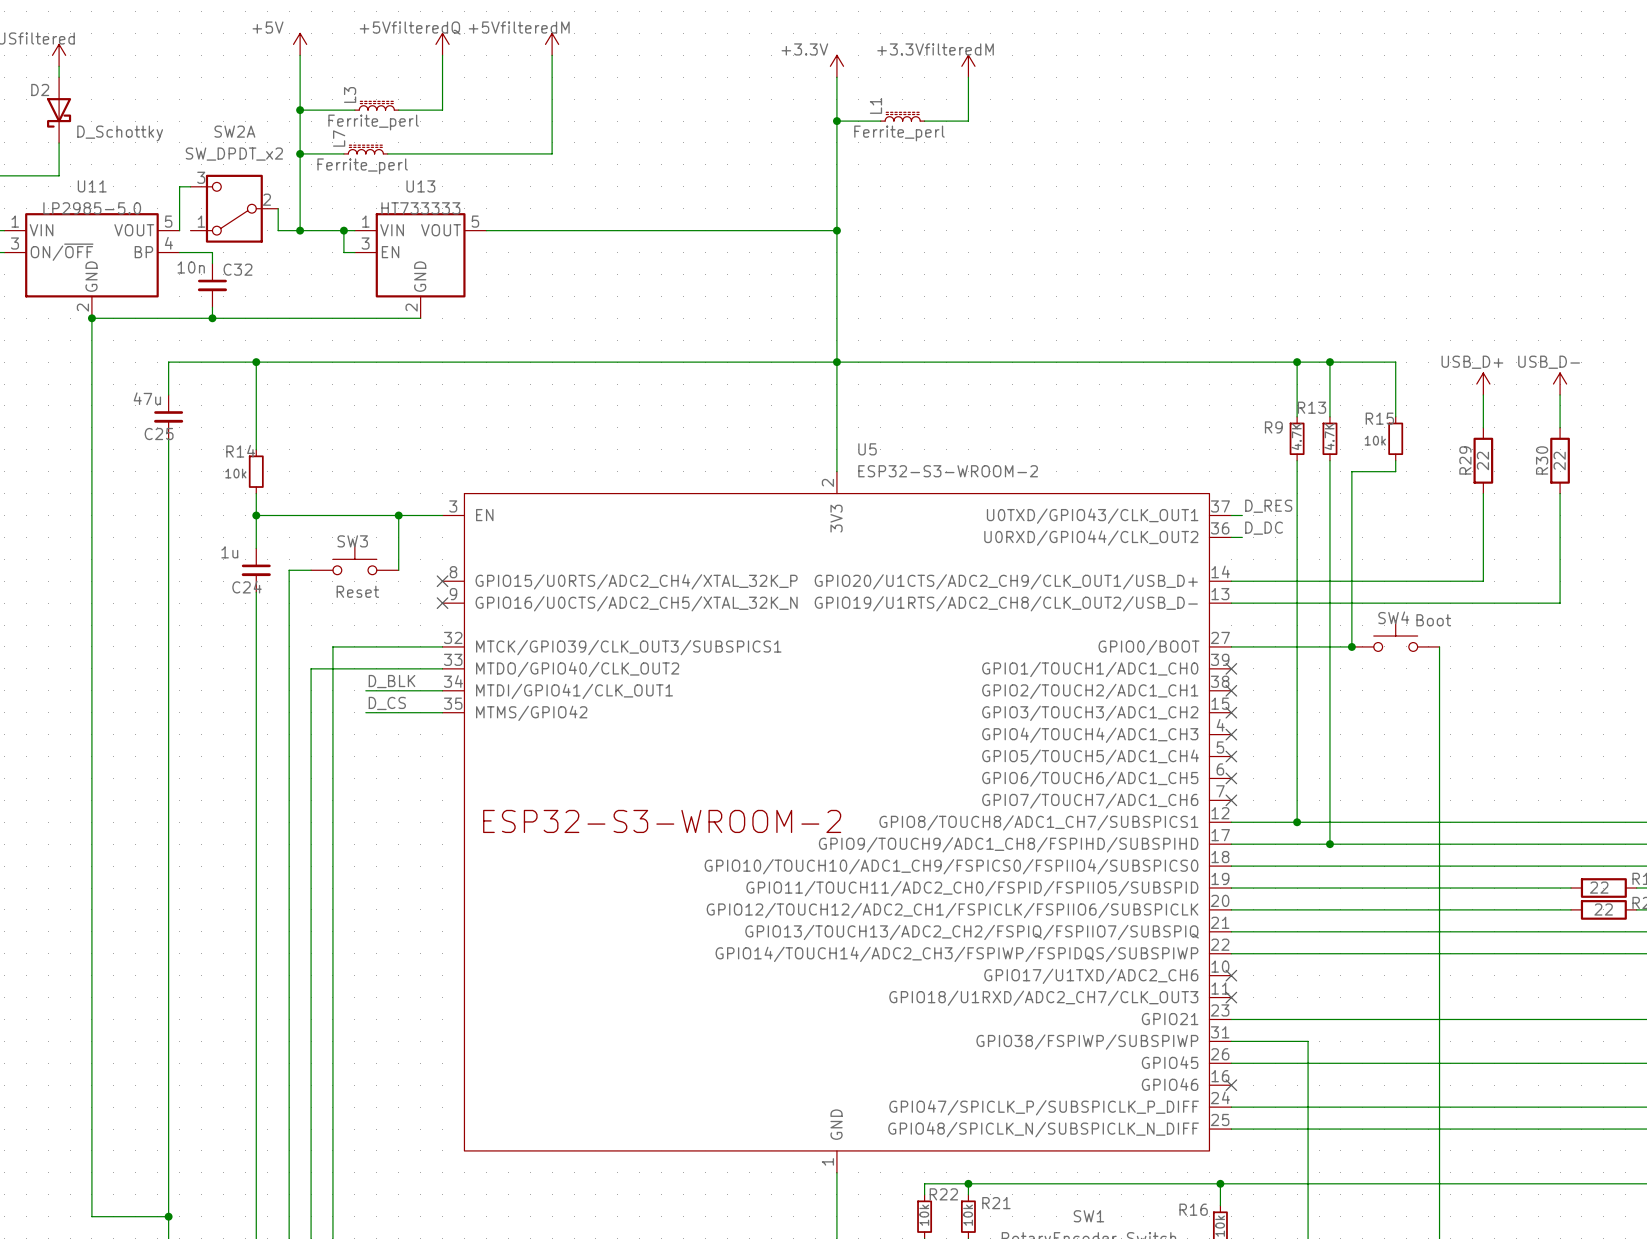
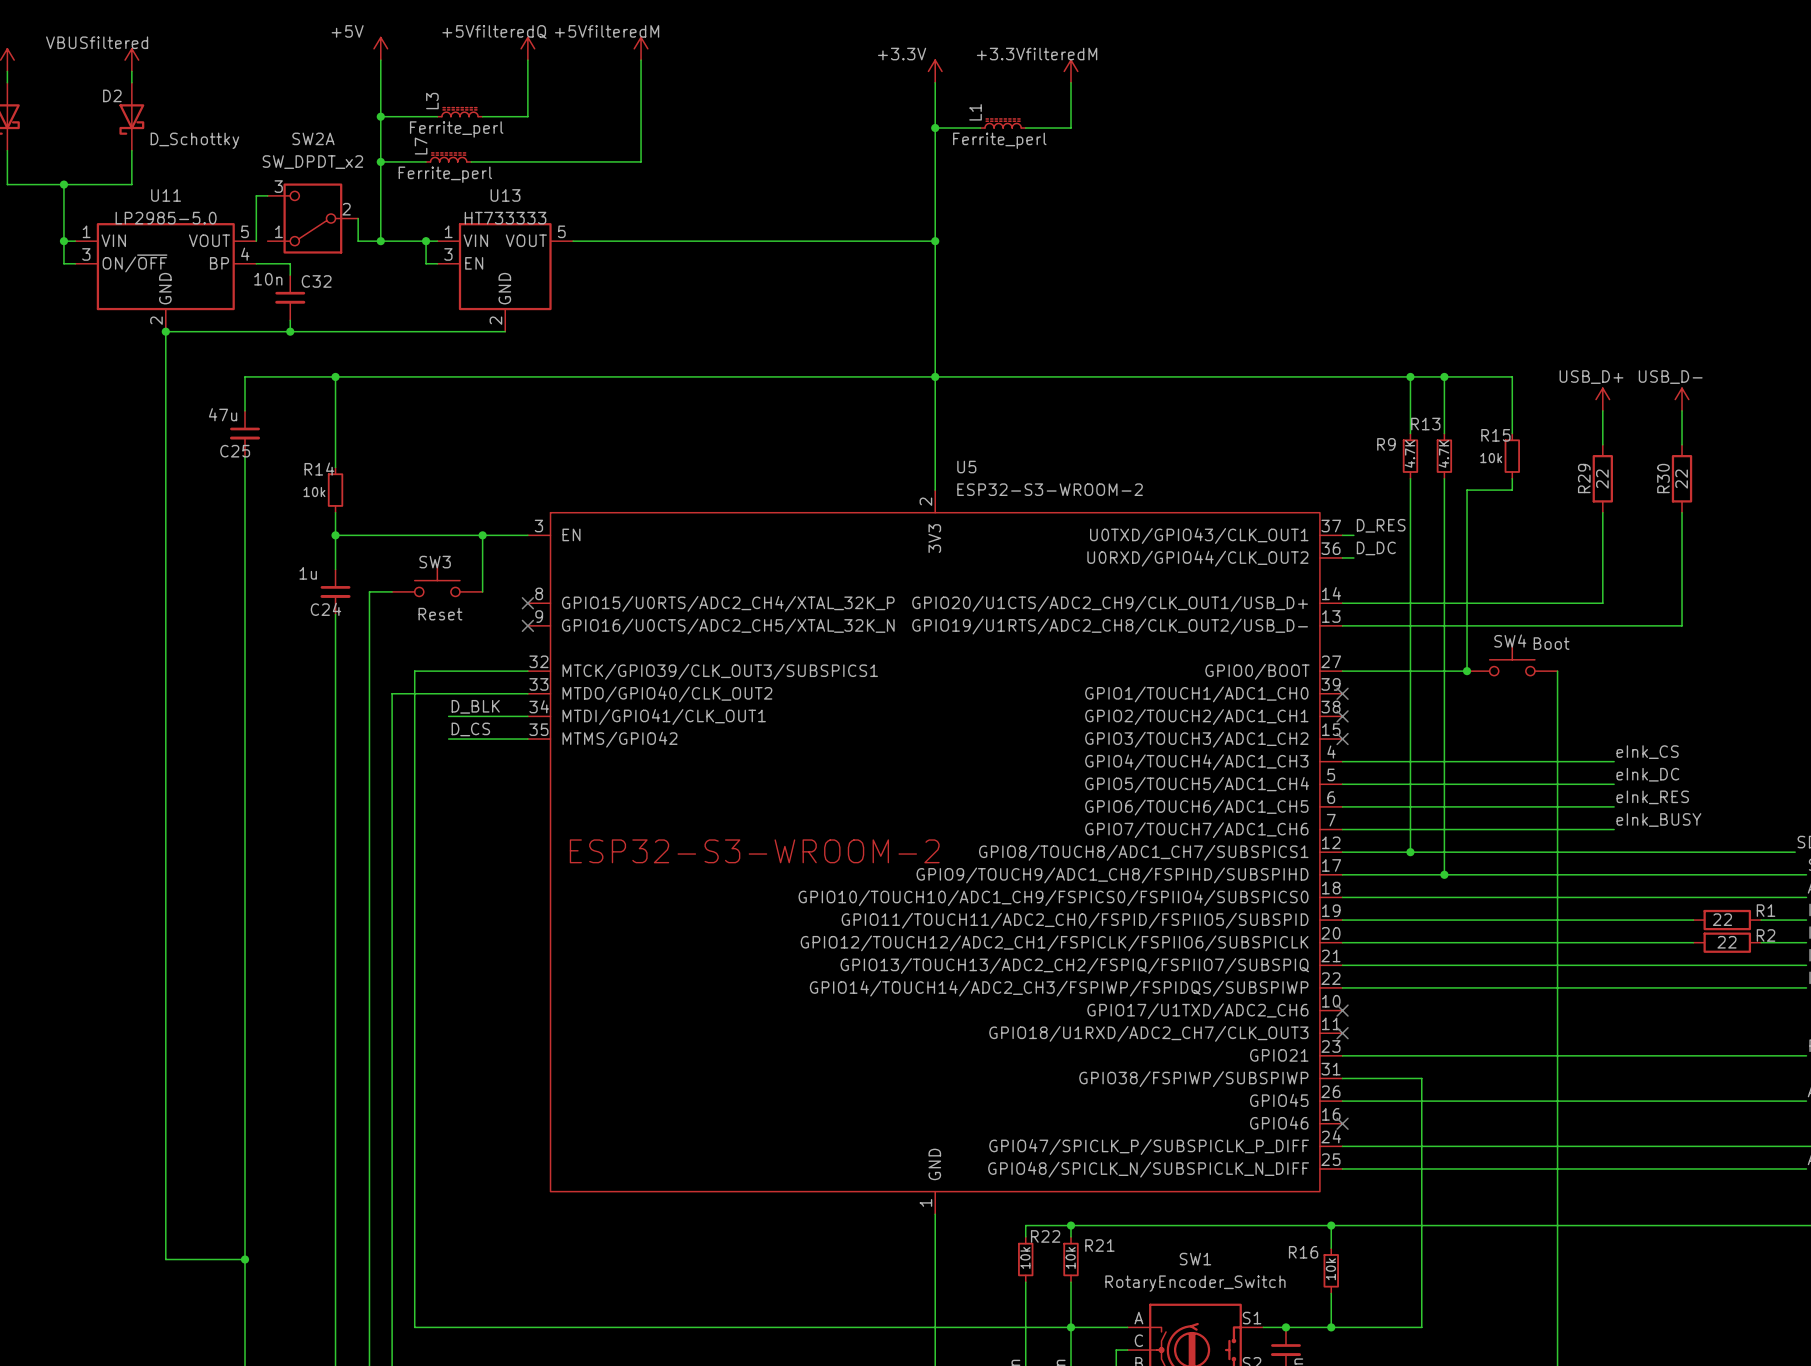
label: none -> eInk_CS (1647, 752)
wire: none -> (1342, 761) (1614, 761)
no-connect mark: (1231, 734) -> none
label: none -> eInk_DC (1647, 774)
wire: none -> (1342, 784) (1614, 784)
no-connect mark: (1231, 756) -> none
label: none -> eInk_RES (1652, 797)
wire: none -> (1342, 806) (1614, 806)
no-connect mark: (1231, 778) -> none
label: none -> eInk_BUSY (1658, 819)
wire: none -> (1342, 829) (1614, 829)
no-connect mark: (1231, 800) -> none

